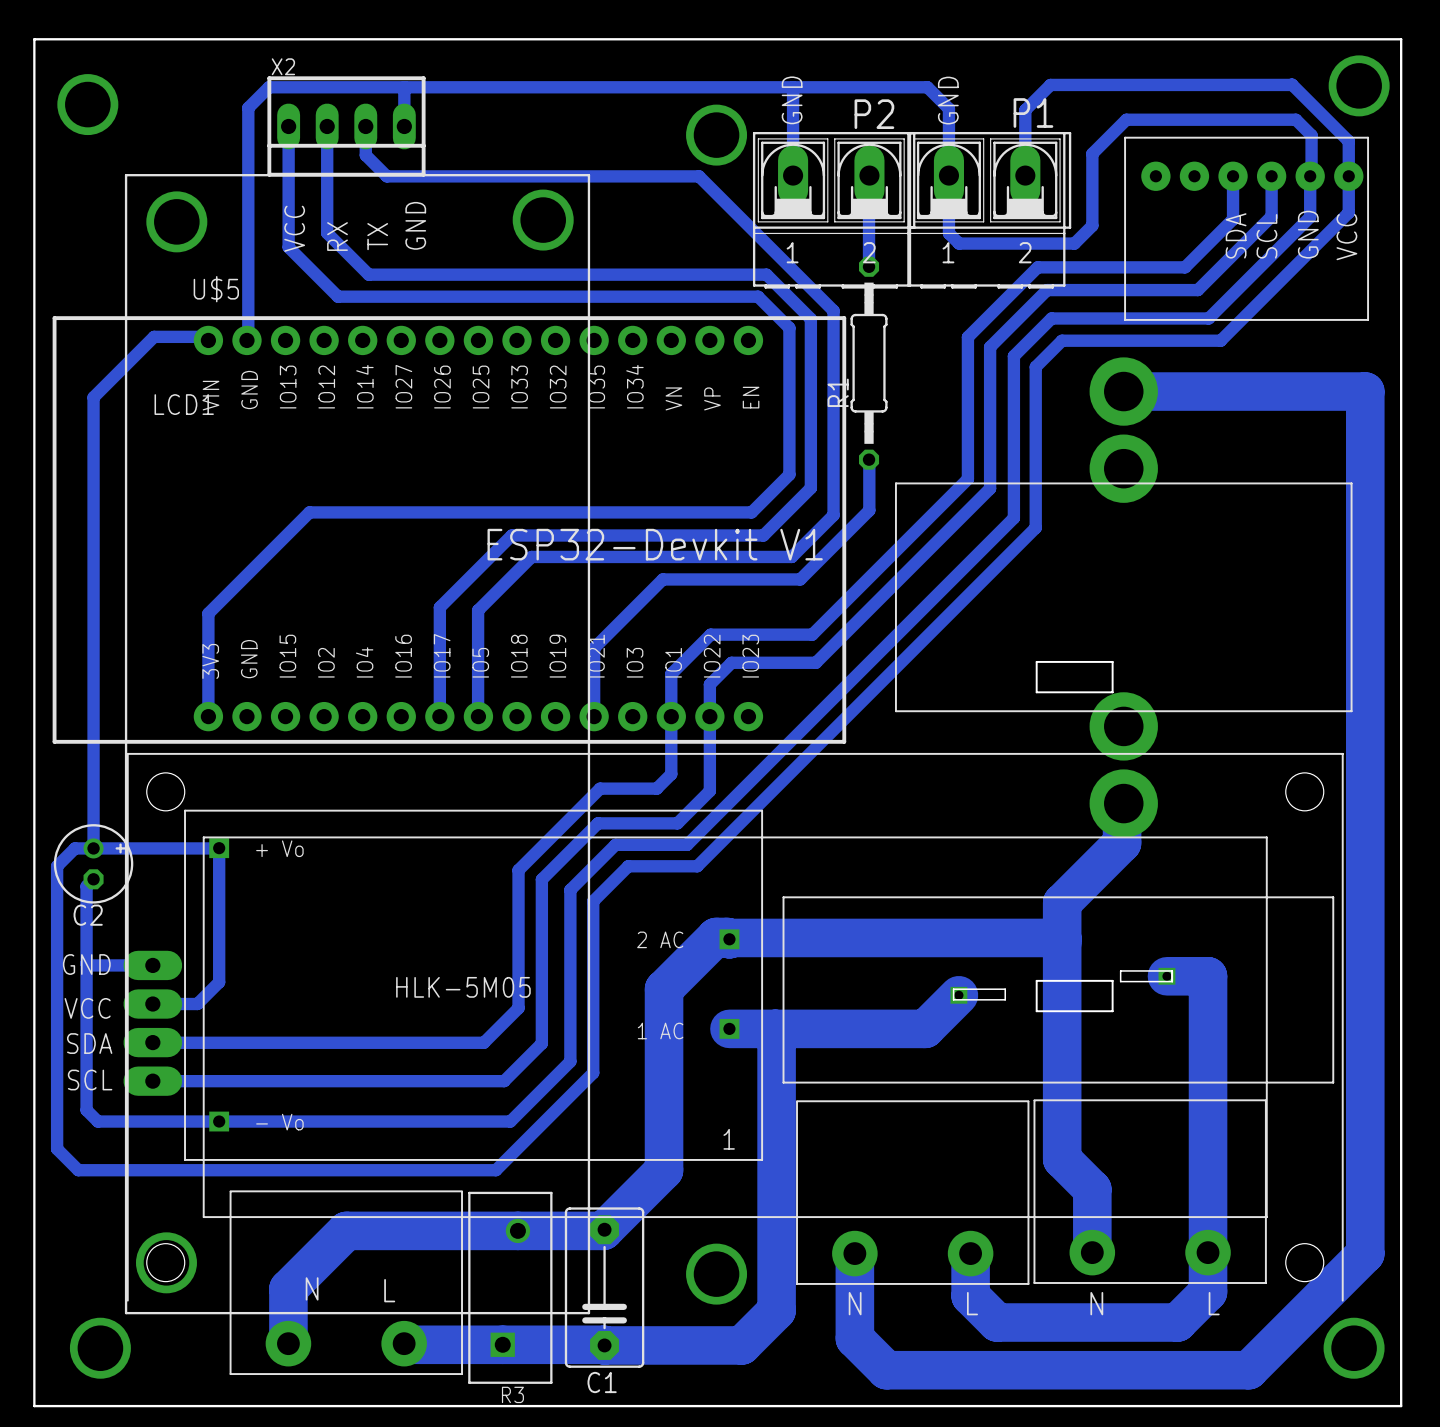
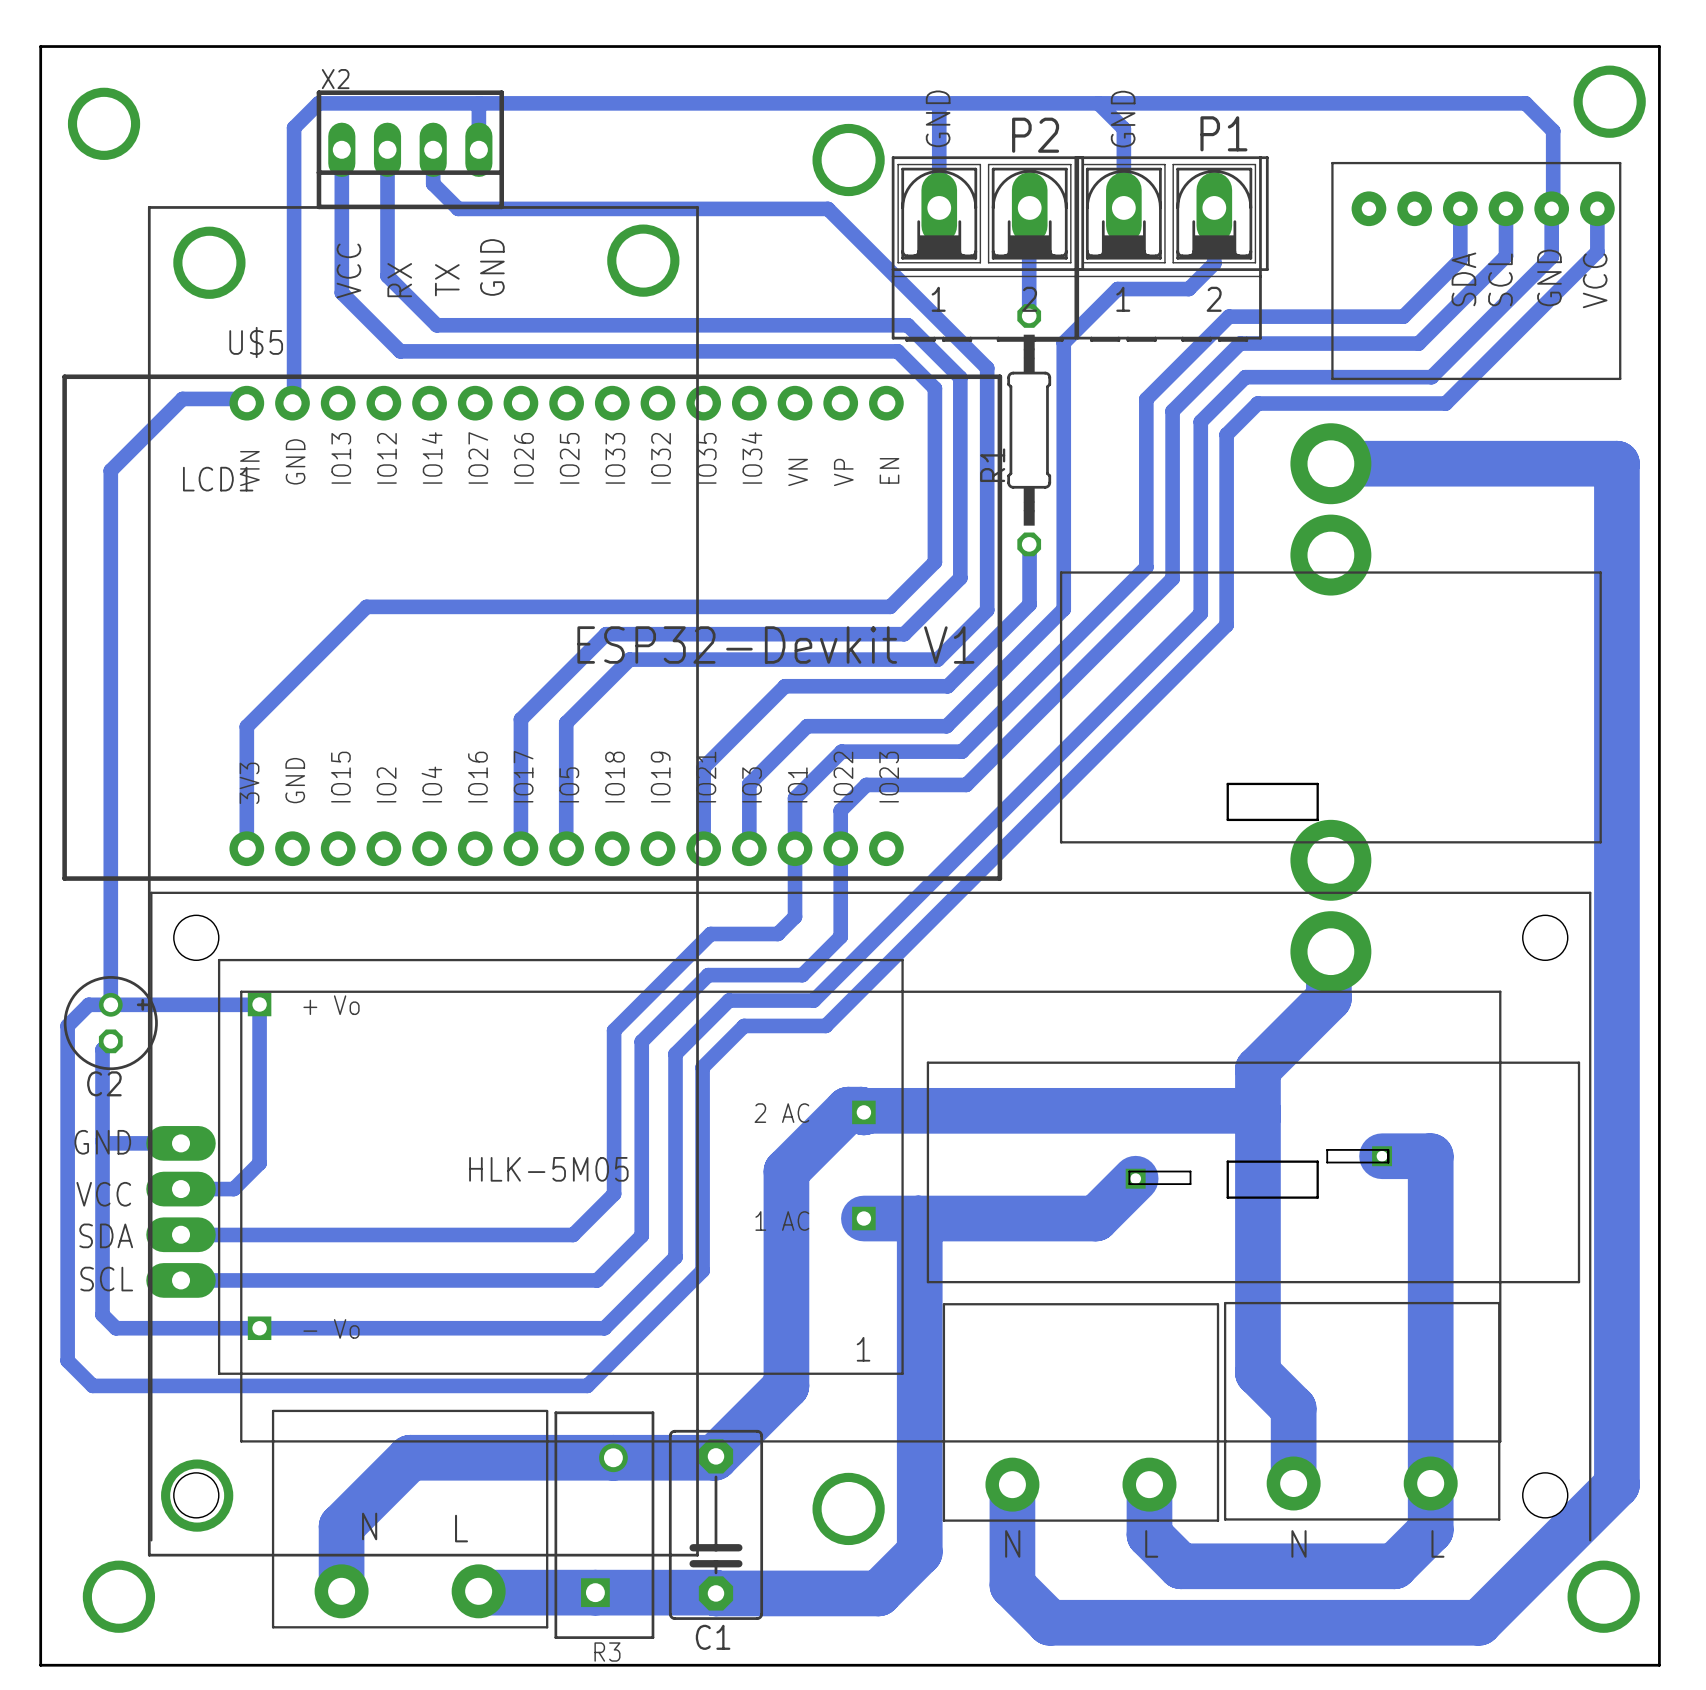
bottom track: (1311, 174) (1311, 135) (1295, 119) (1126, 119) (1092, 153) (1092, 225) (1074, 243) (959, 243) (948, 233) (948, 175) -> (1553, 207) (1553, 130) (1525, 103) (1098, 103)
bottom track: (1025, 175) (1025, 110) (1050, 84) (1292, 84) (1348, 141) (1348, 176) -> (1214, 207) (1214, 263) (1188, 289) (1117, 289) (1063, 342) (1063, 609) (946, 726) (807, 726) (749, 784) (749, 848)

